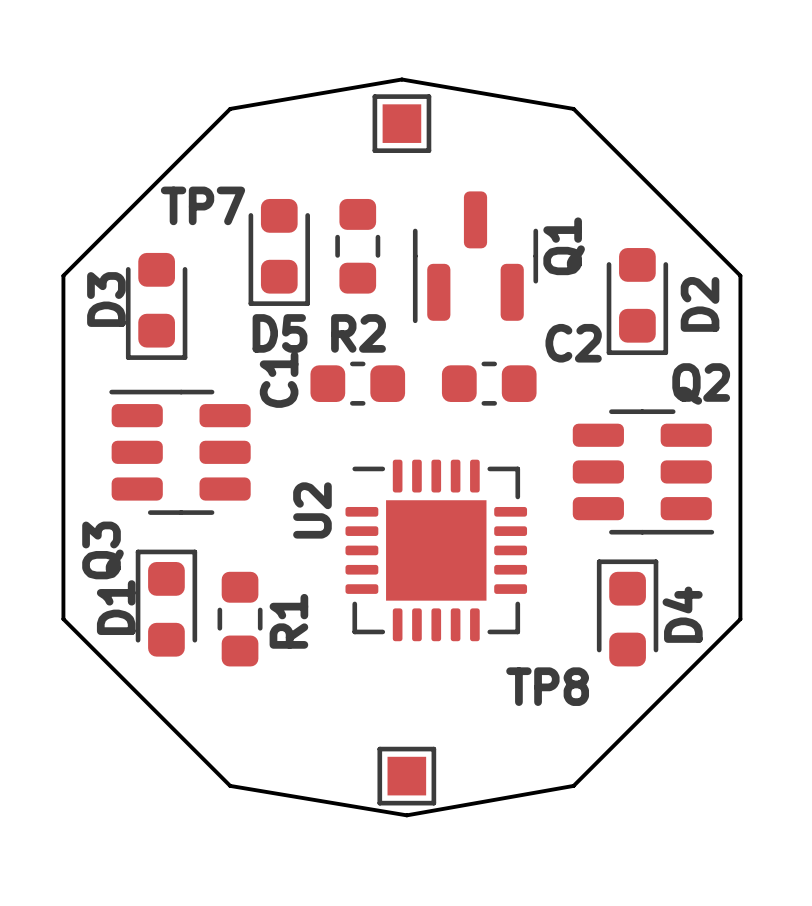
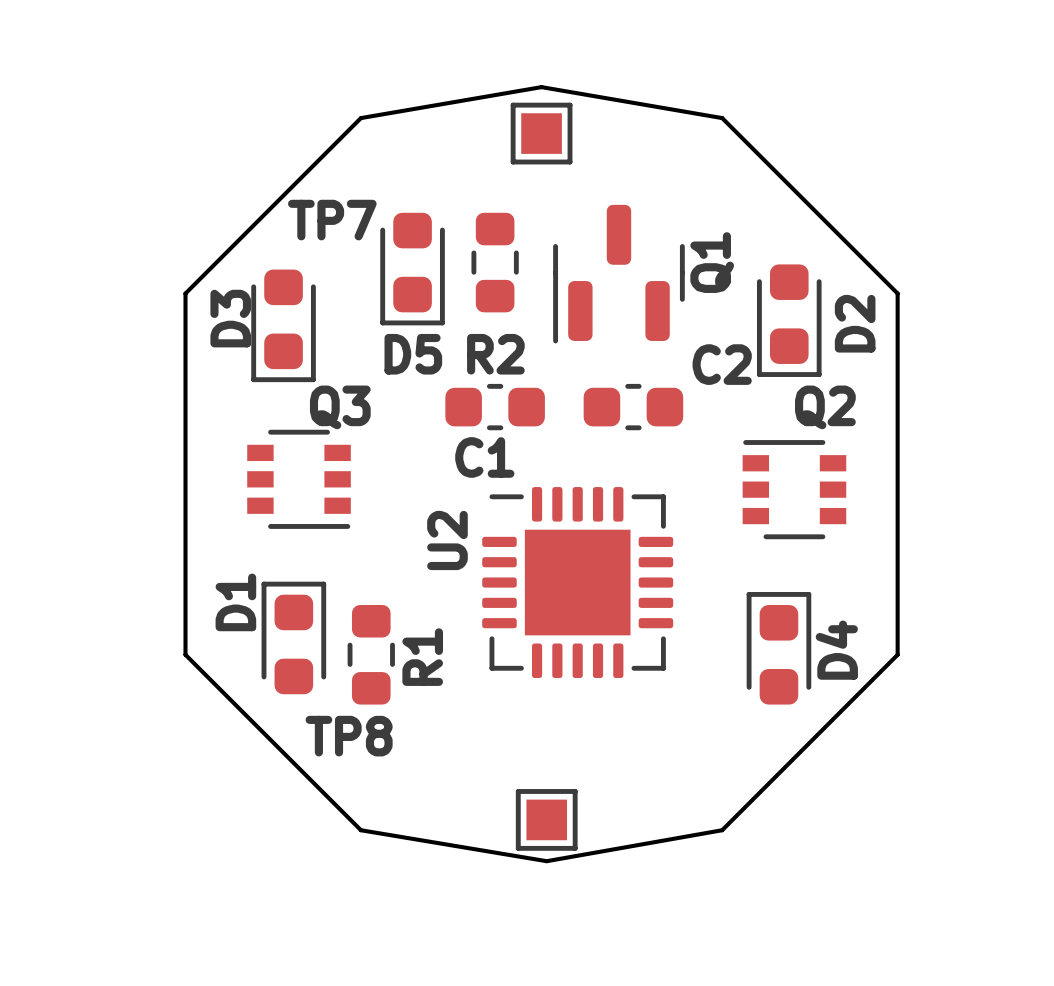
C1 name rotation: 0° (279, 379) -> 90° clockwise (484, 457)
C1 name position: C1 (279, 379) -> C1 (484, 457)
Q3 footprint: [109, 389, 251, 515] -> [247, 429, 351, 529]
Q2 footprint: [572, 409, 715, 535] -> [742, 440, 847, 540]
Q3 name rotation: 0° (102, 550) -> 90° clockwise (340, 407)
Q3 name position: Q3 (102, 550) -> Q3 (340, 407)
D1 name position: D1 (116, 607) -> D1 (235, 602)
TP8 name position: TP8 (547, 686) -> TP8 (349, 736)

